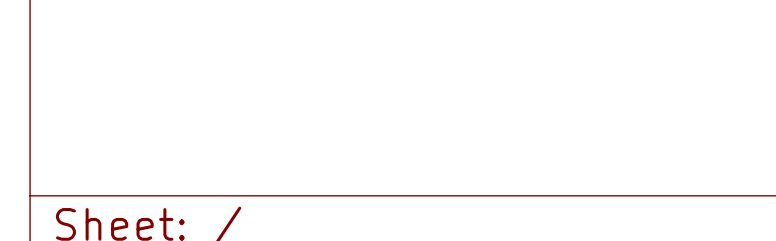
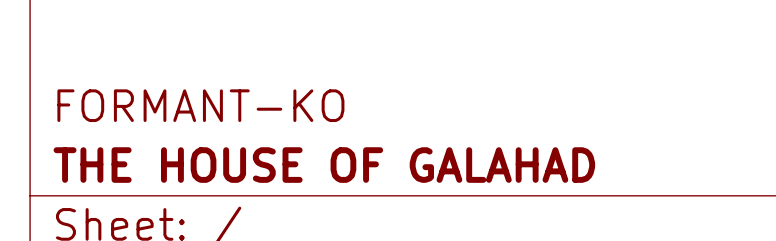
title block: none -> FORMANT-KO (200, 105)
title block: none -> THE HOUSE OF GALAHAD (324, 165)

